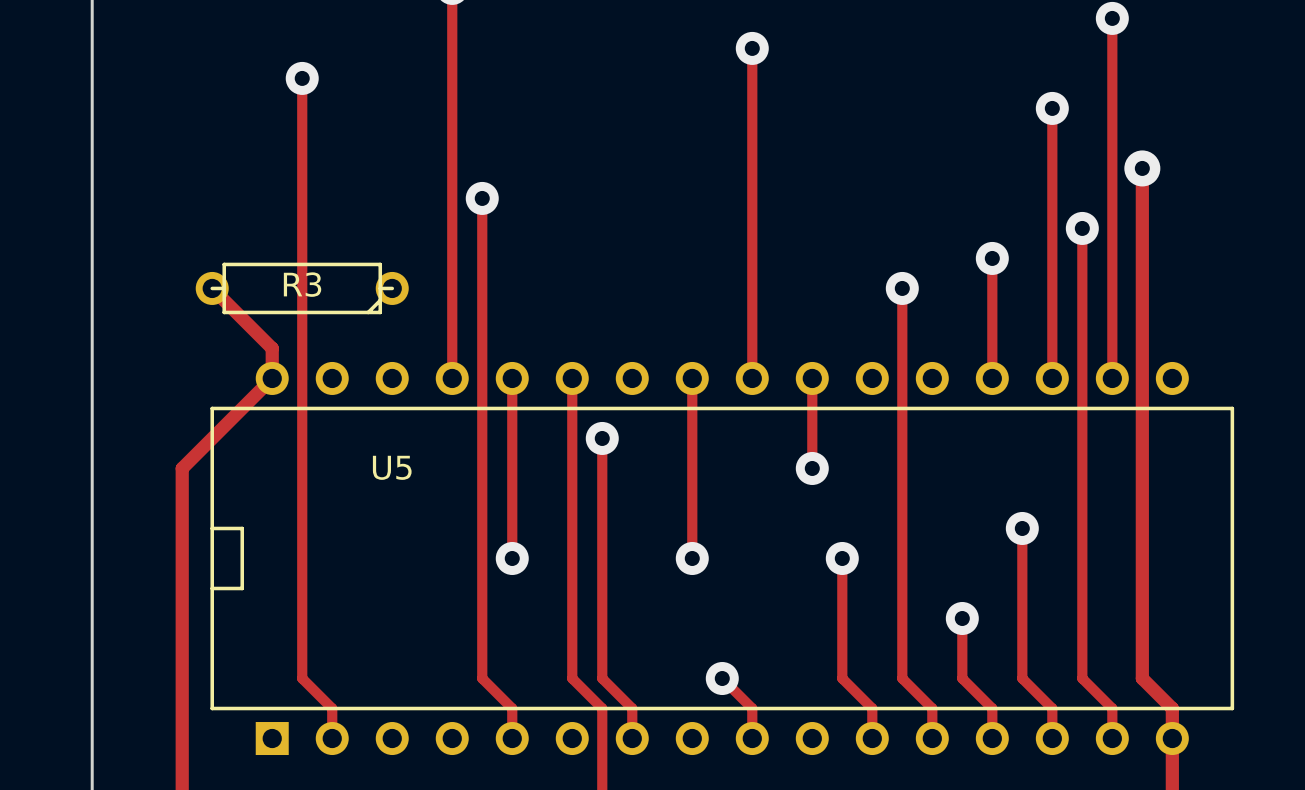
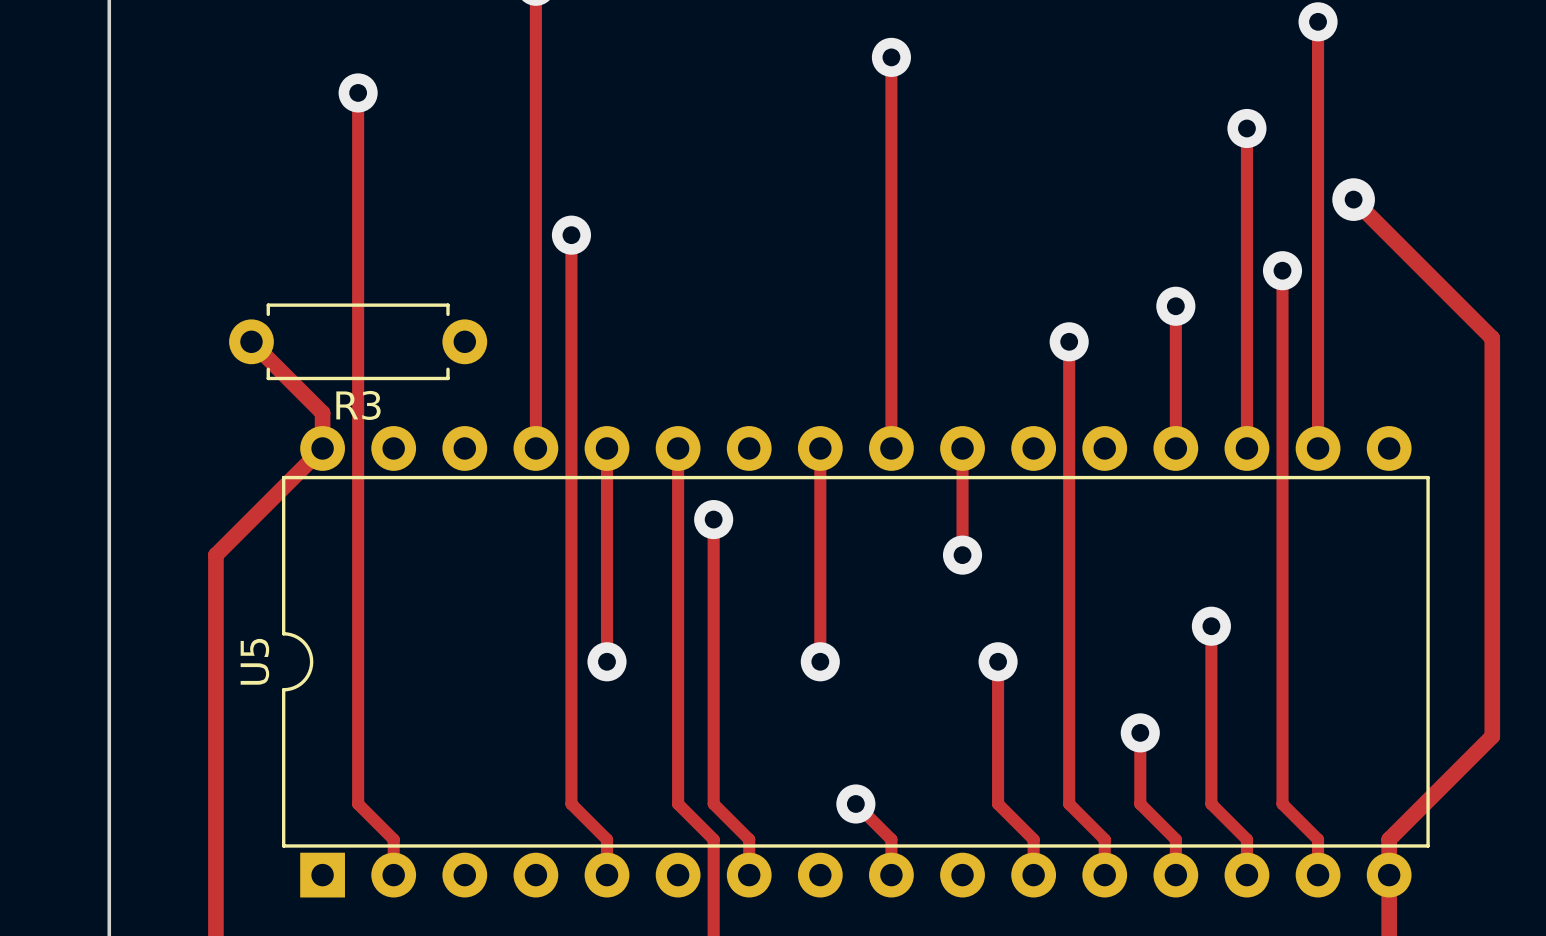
track: (1142, 168) (1142, 678) (1172, 708) -> (1353, 199) (1492, 338) (1492, 736) (1389, 839)
R3 footprint: [195, 262, 409, 315] -> [229, 303, 488, 381]
R3 name position: R3 (302, 284) -> R3 (358, 405)
U5 footprint: [210, 361, 1235, 756] -> [281, 426, 1430, 898]
U5 name position: U5 (392, 467) -> U5 (254, 661)

